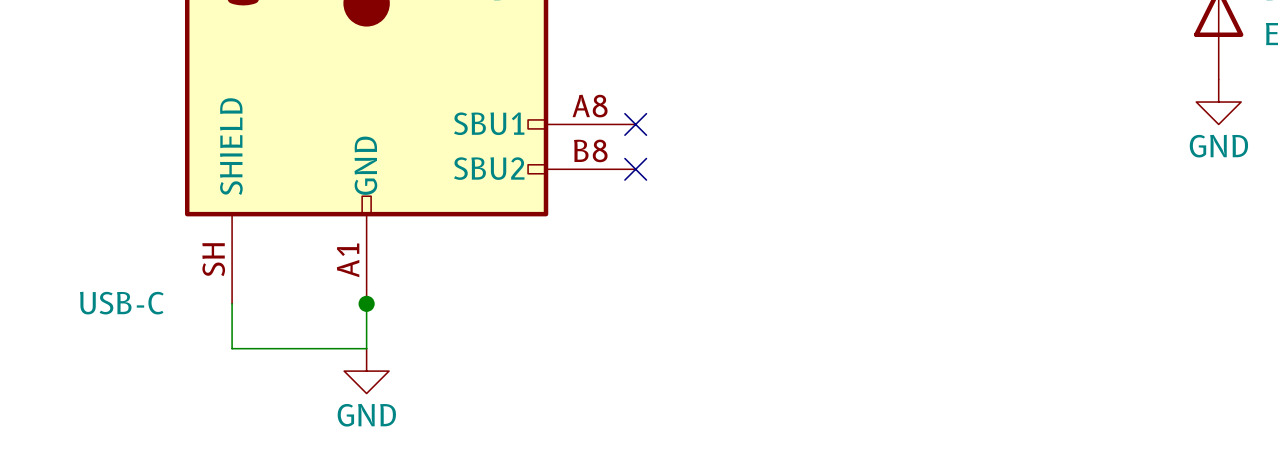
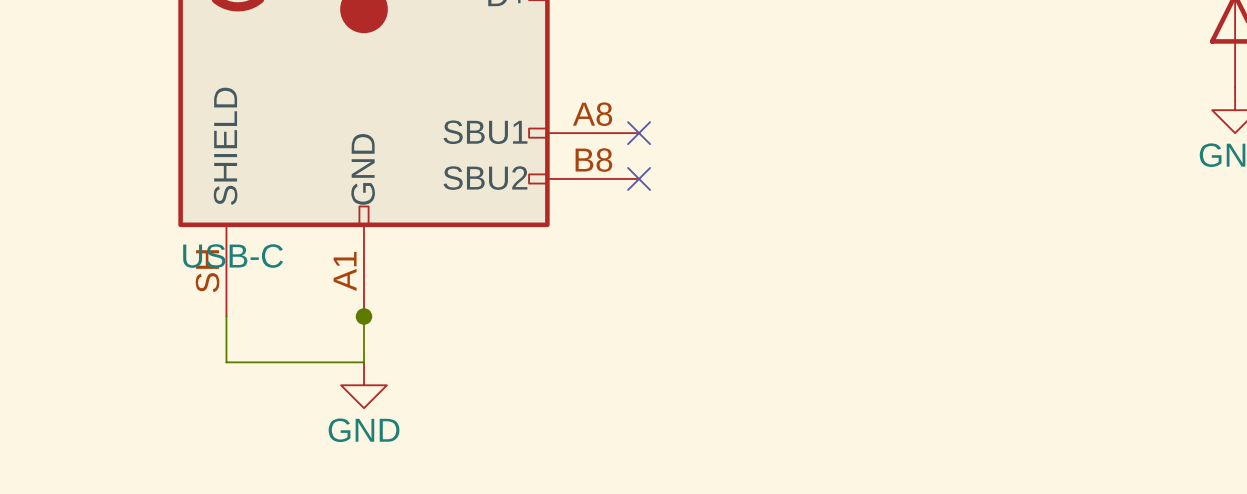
part value position: USB-C (121, 303) -> USB-C (233, 256)

